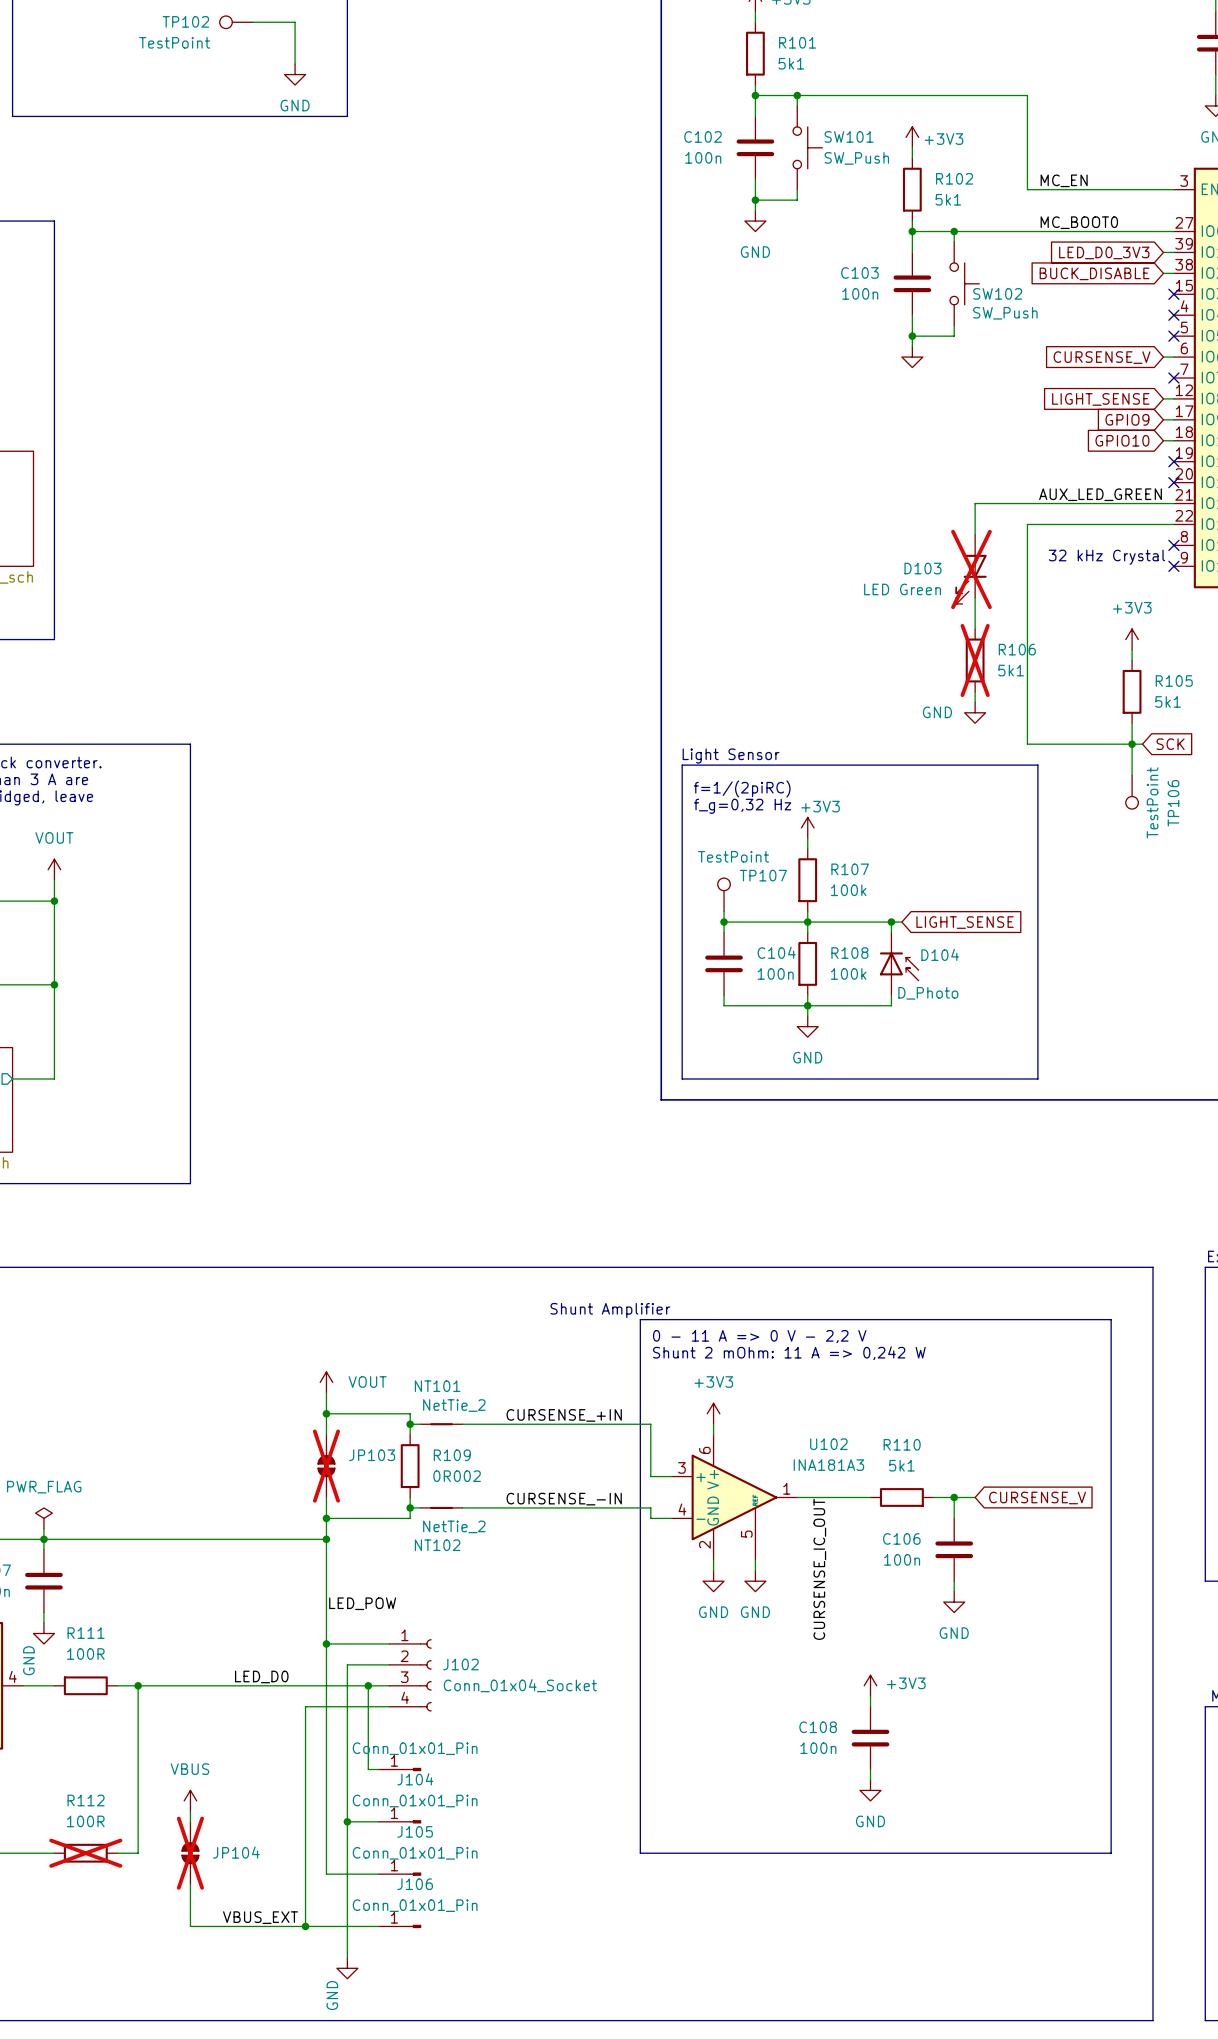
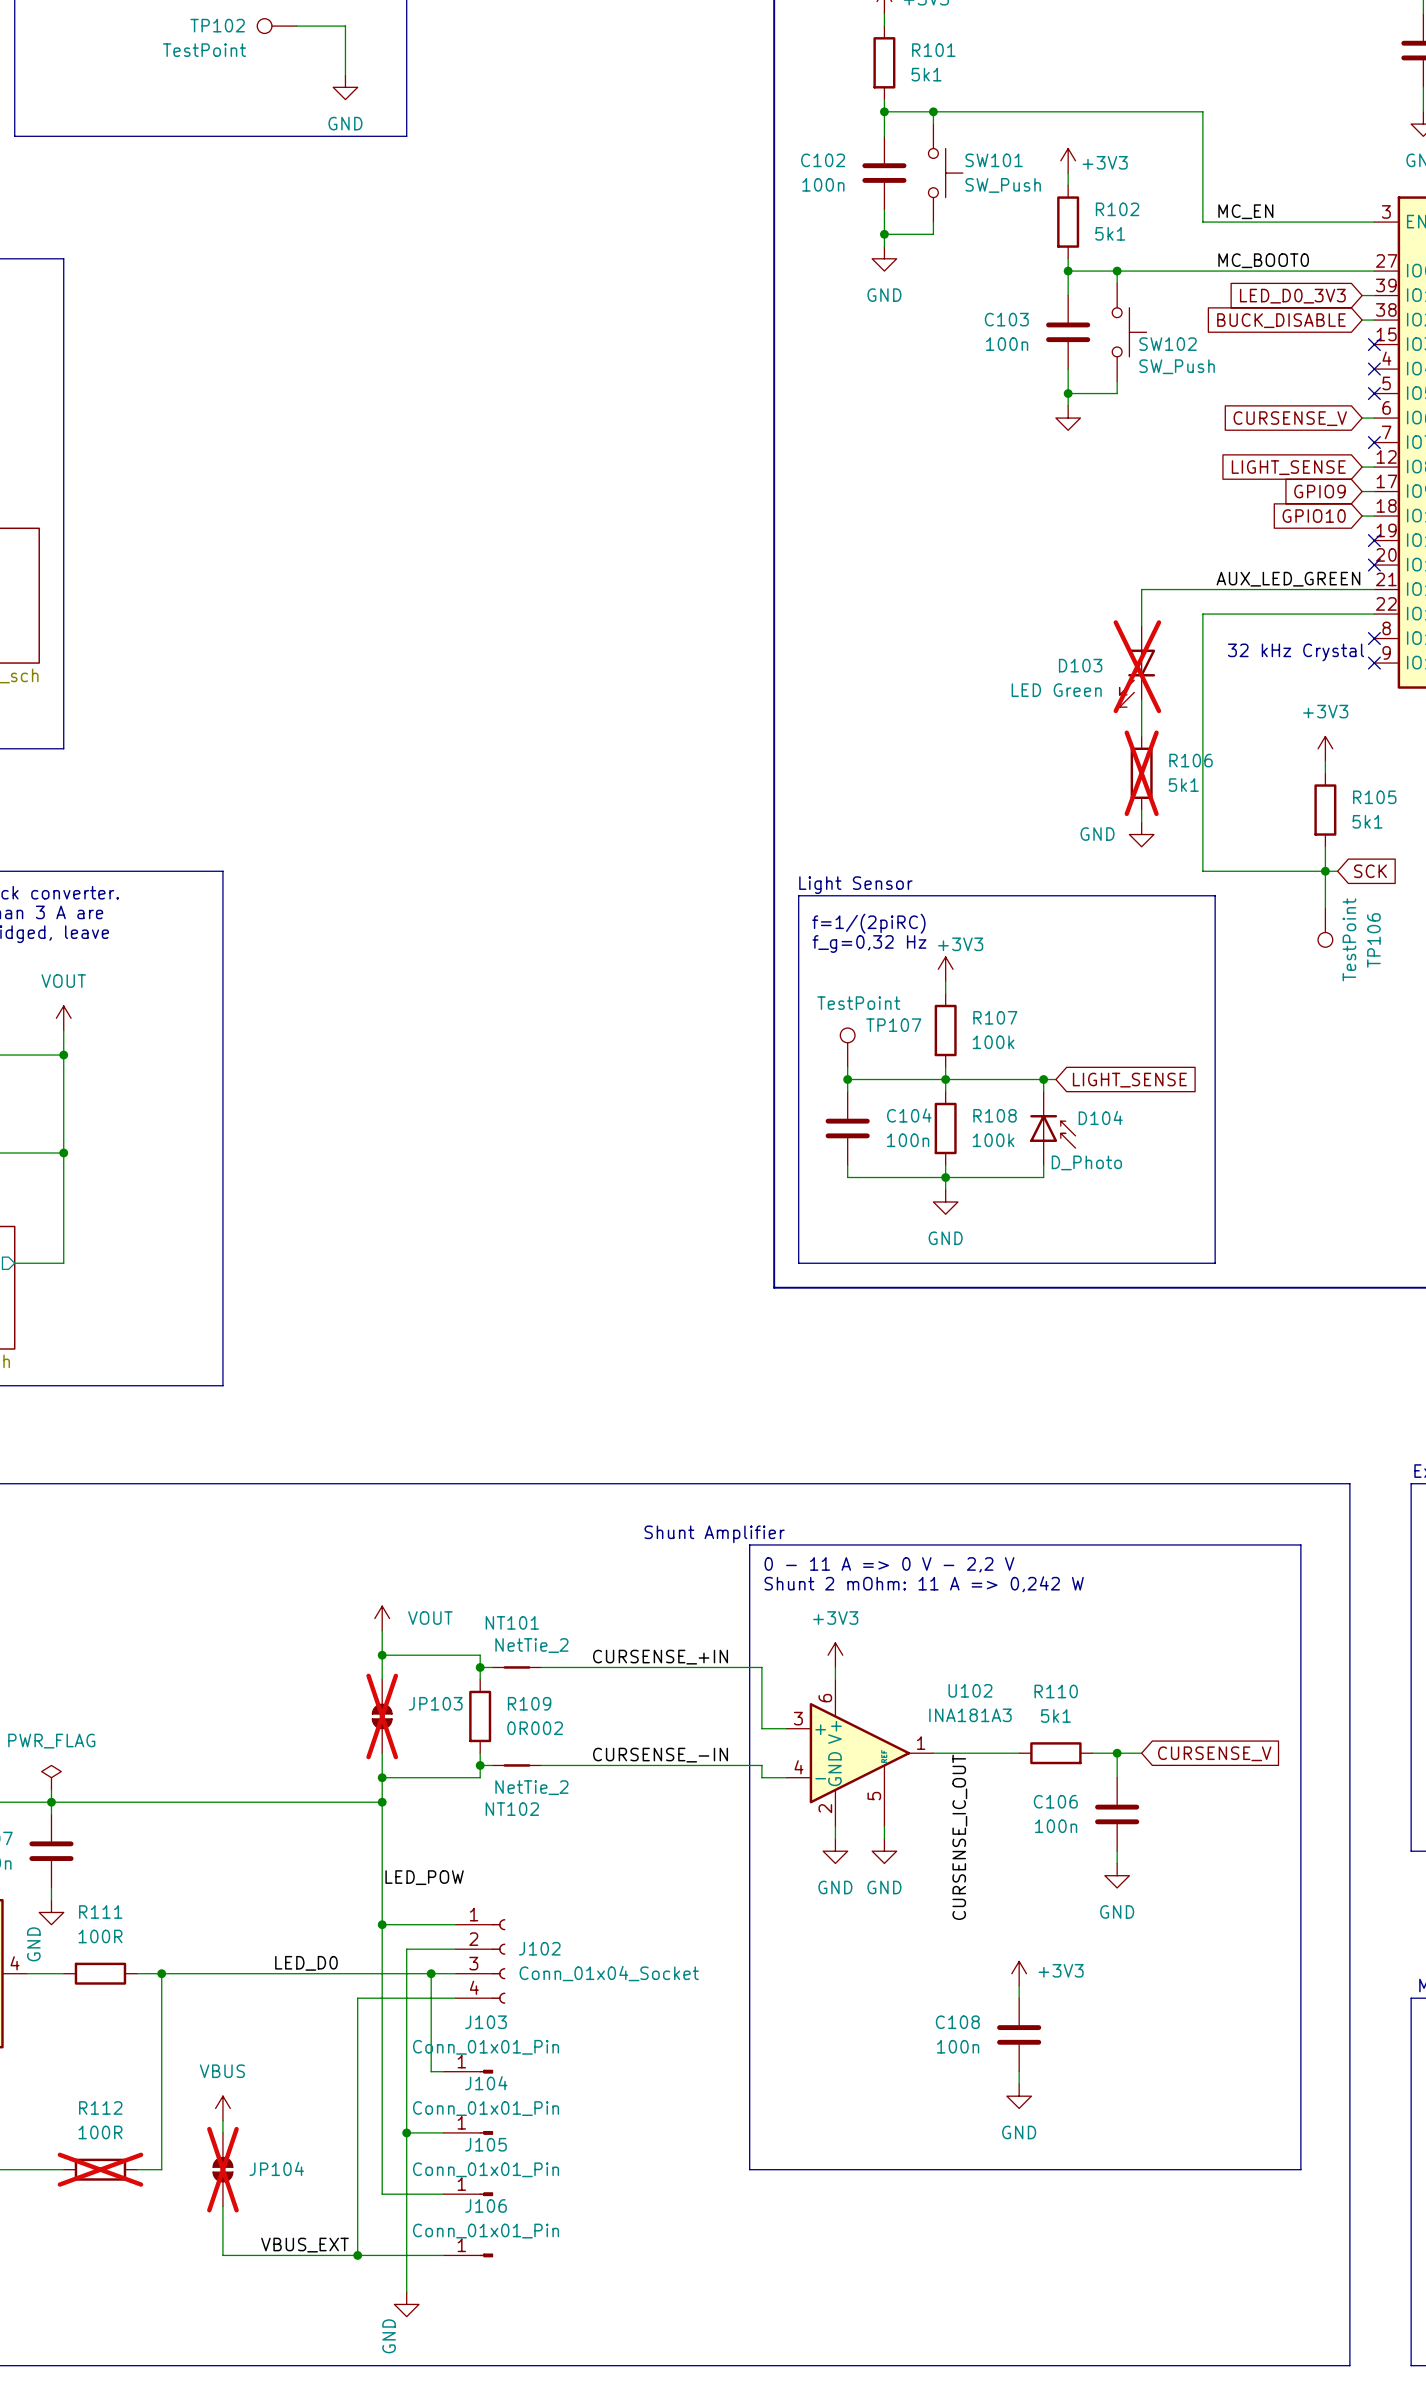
J103 name: none -> J103 (486, 2022)

